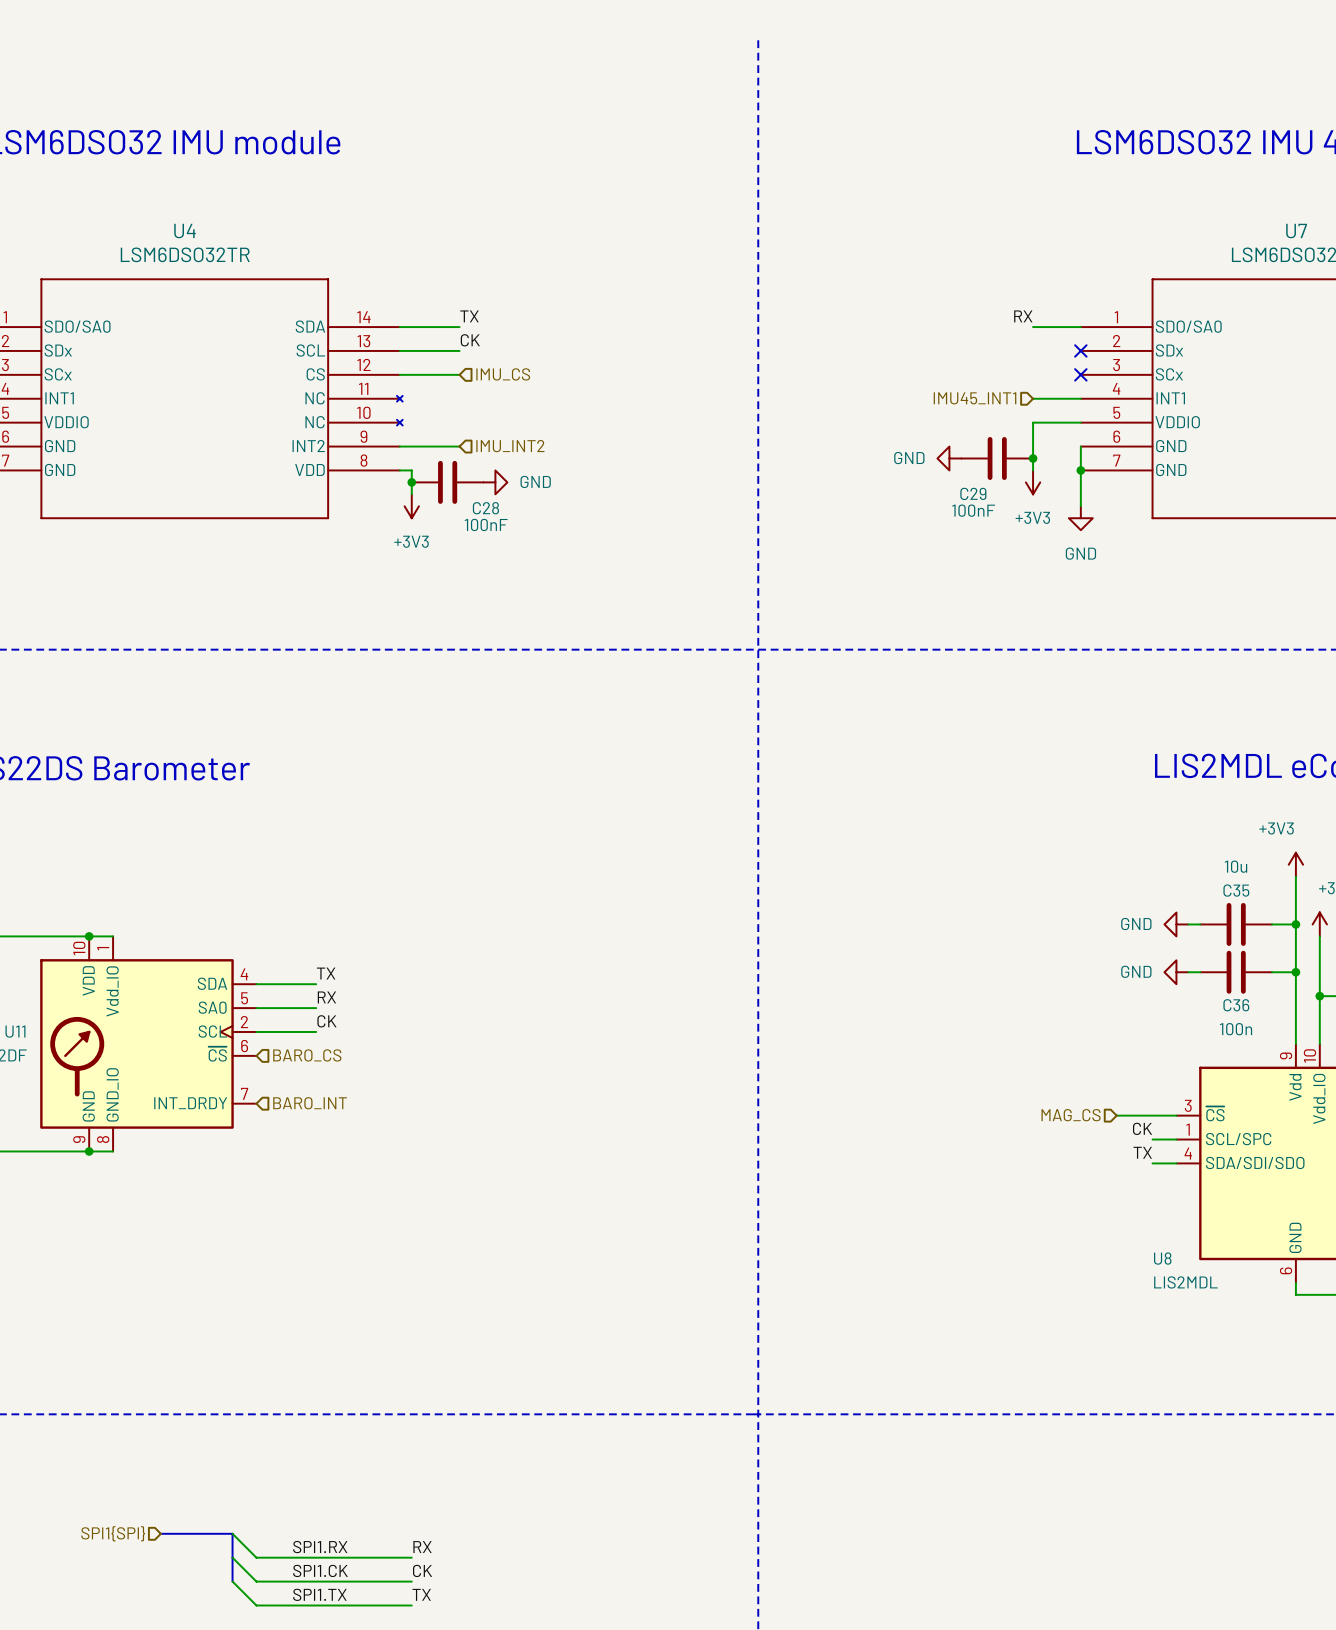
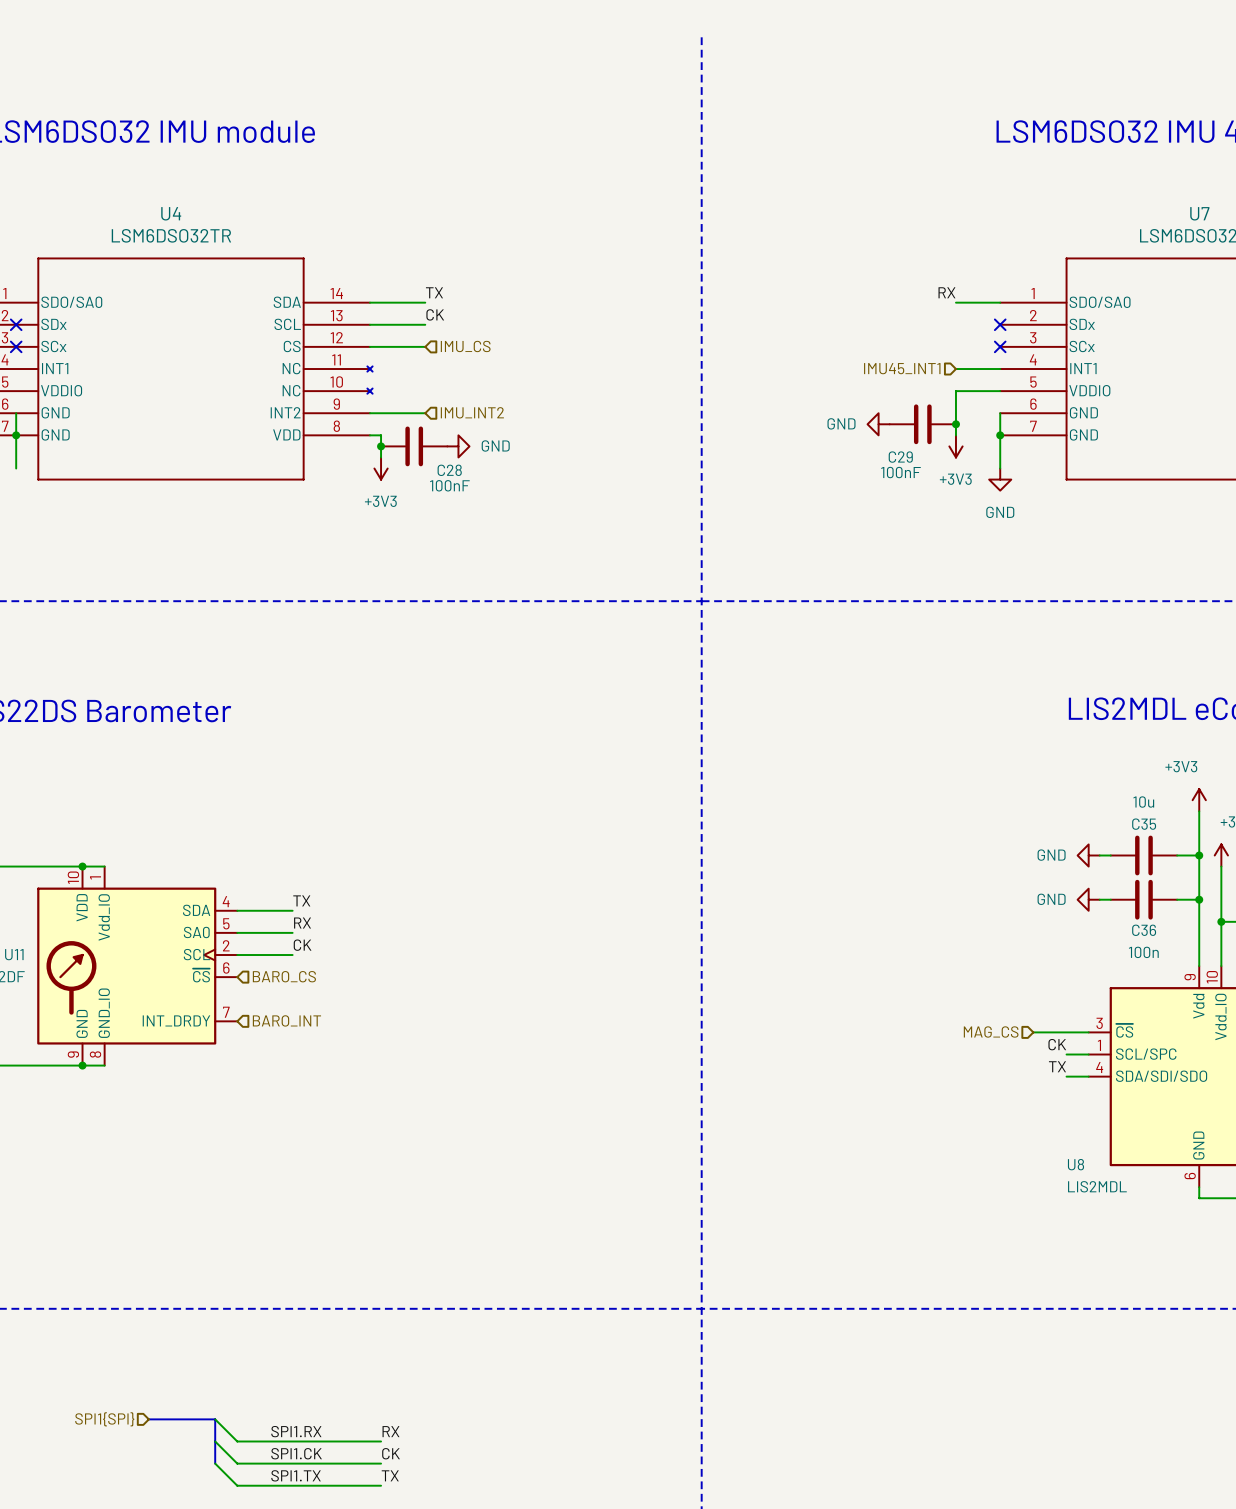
no-connect mark: none -> (16, 324)
no-connect mark: none -> (16, 346)
wire: none -> (16, 413) (16, 468)
junction: none -> (16, 435)

